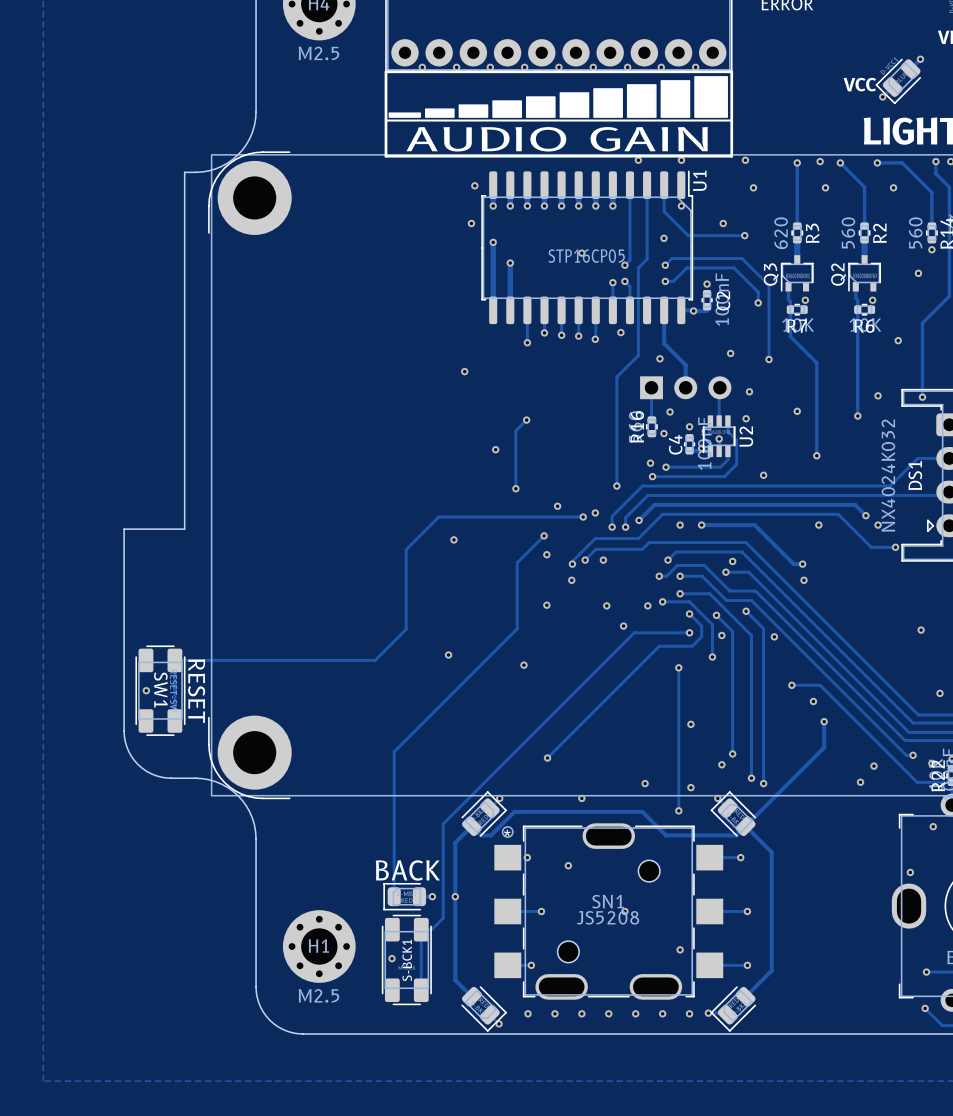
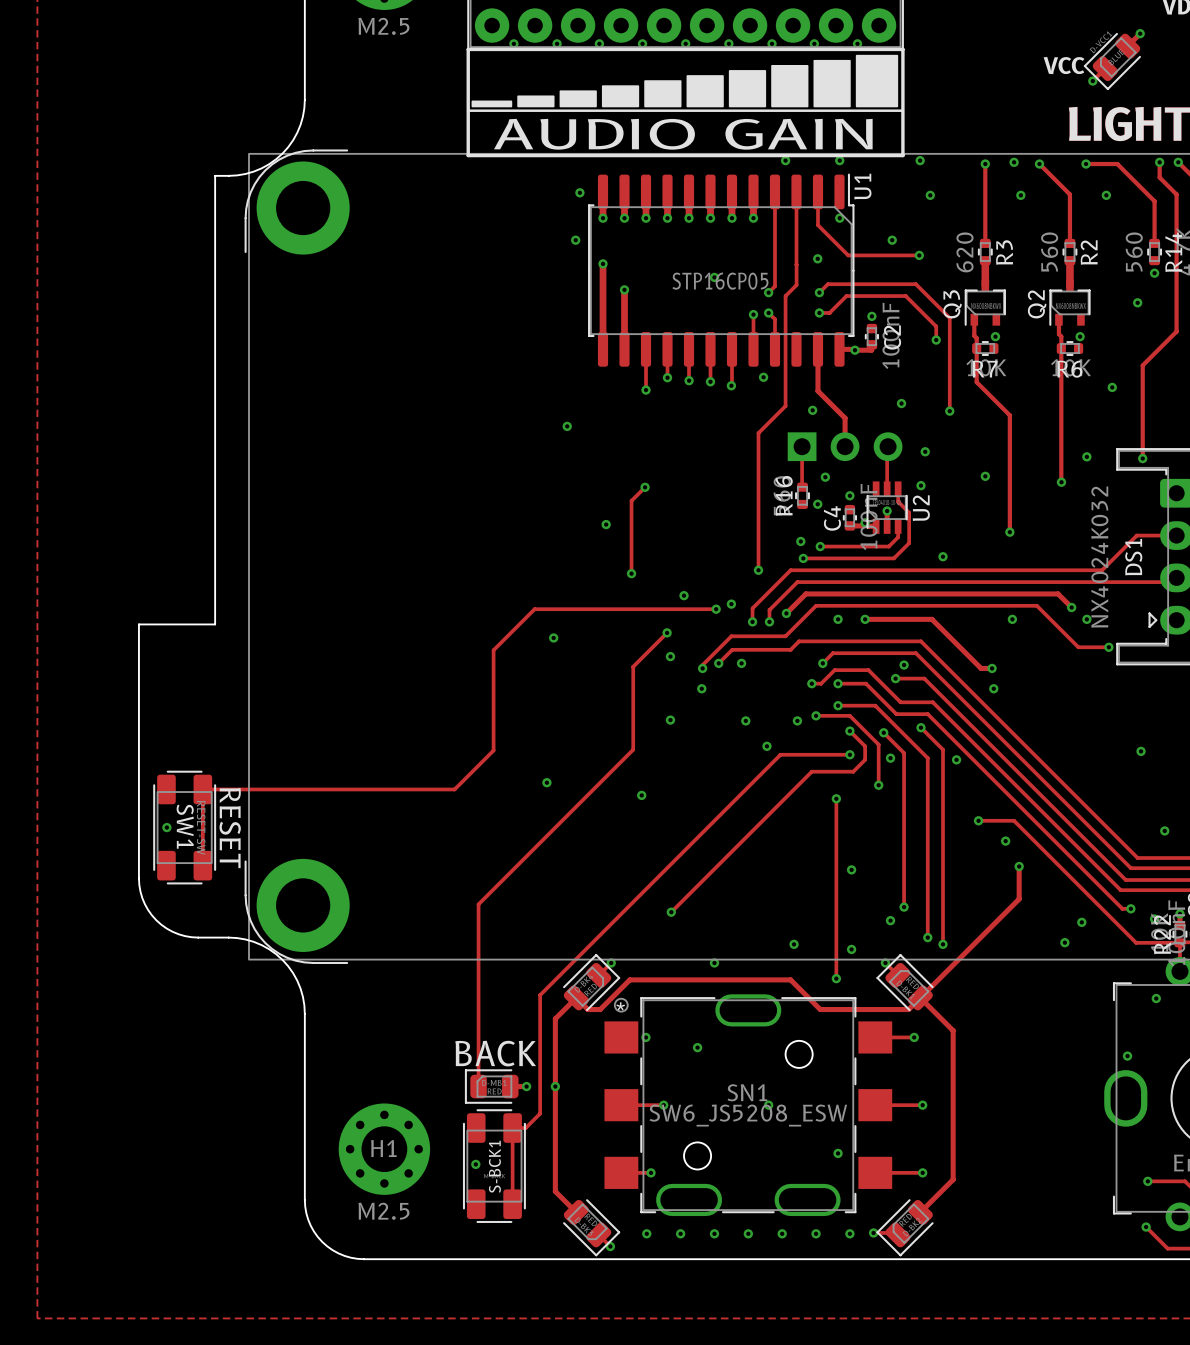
SN1 value: JS5208 (608, 917) -> SW6_JS5208_ESW (748, 1115)

